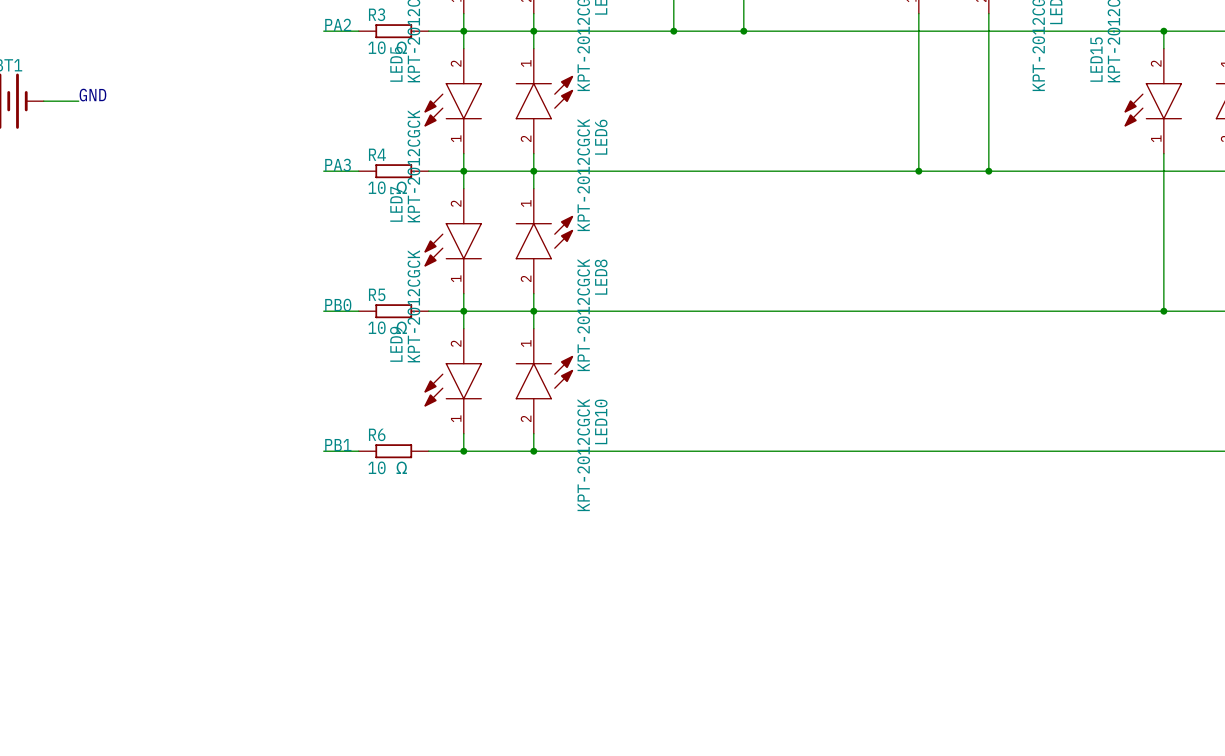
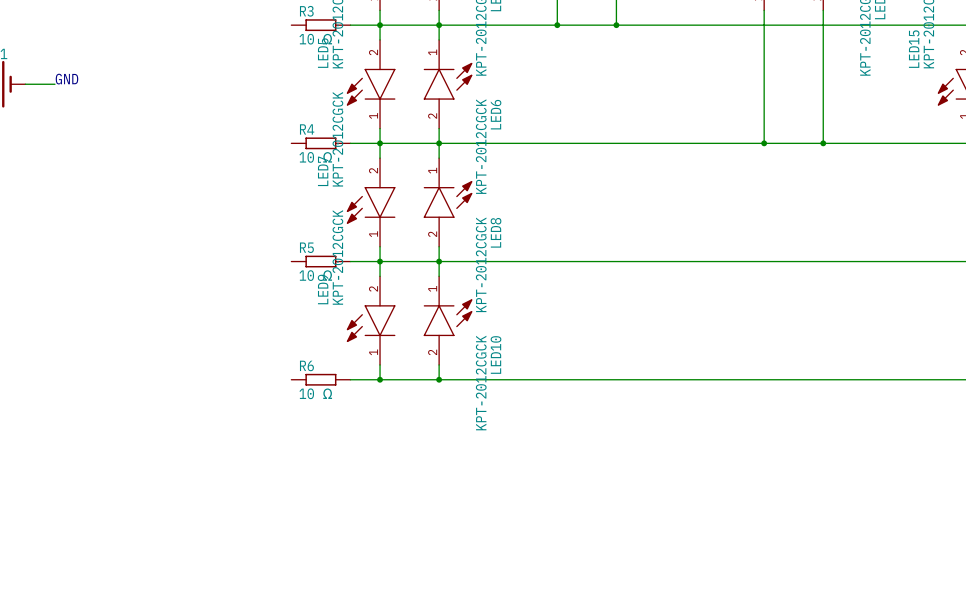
text: PA2 (338, 24) -> none
wire: (323, 31) (358, 31) -> none
text: PA3 (338, 165) -> none
wire: (323, 171) (358, 171) -> none
text: PB0 (338, 305) -> none
wire: (323, 311) (358, 311) -> none
text: PB1 (338, 445) -> none
wire: (323, 451) (358, 451) -> none

